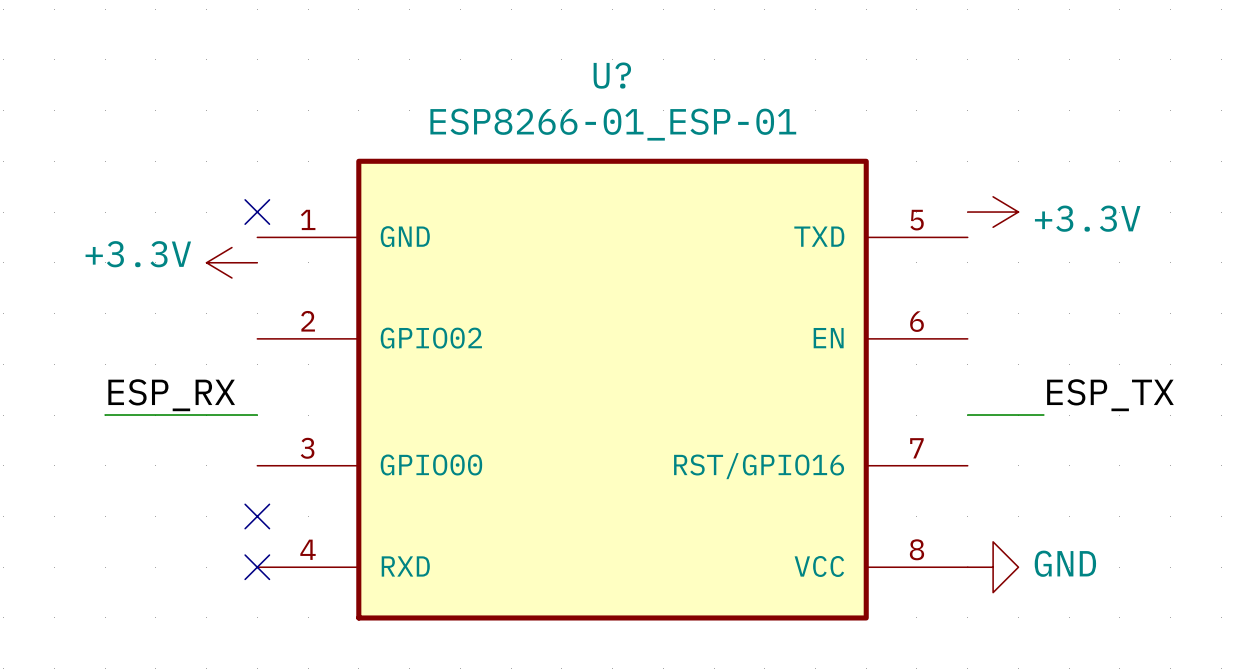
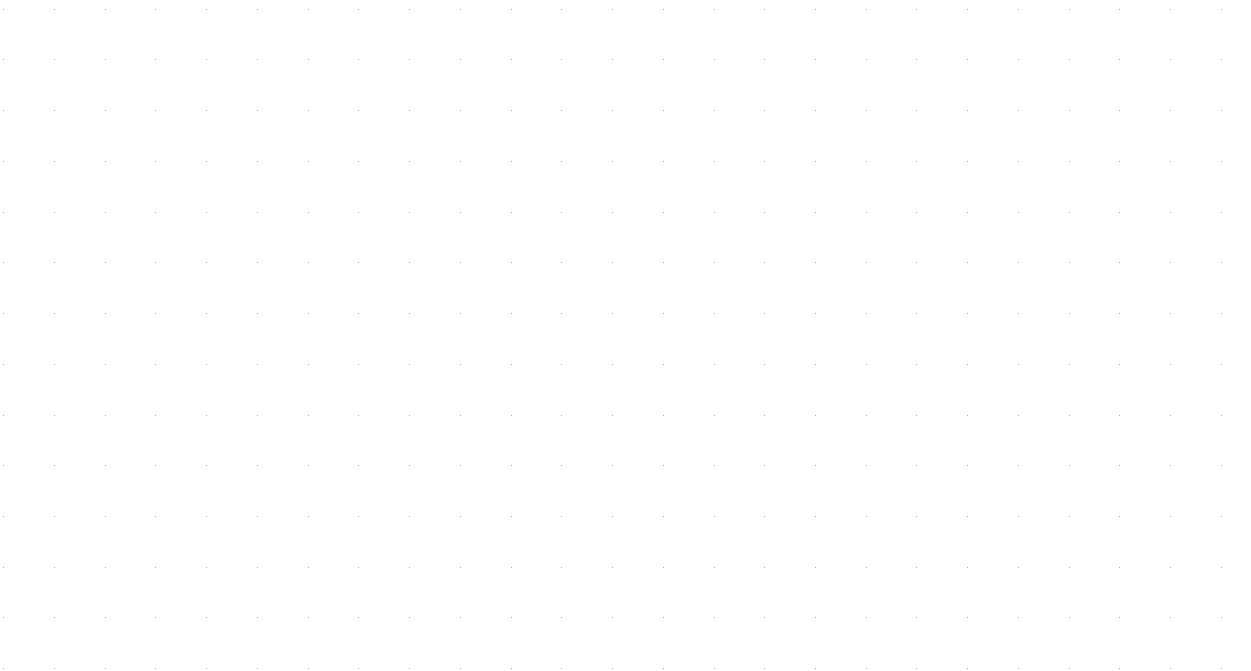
no-connect mark: (257, 212) -> none
power symbol: +3.3V (993, 212) -> none
power symbol: +3.3V (231, 262) -> none
U?: ESP8266-01_ESP-01 (612, 389) -> none
label: ESP_RX (171, 395) -> none
label: ESP_TX (1110, 395) -> none
wire: (105, 415) (257, 415) -> none
wire: (967, 415) (1043, 415) -> none
no-connect mark: (257, 516) -> none
no-connect mark: (257, 567) -> none
power symbol: GND (993, 567) -> none

